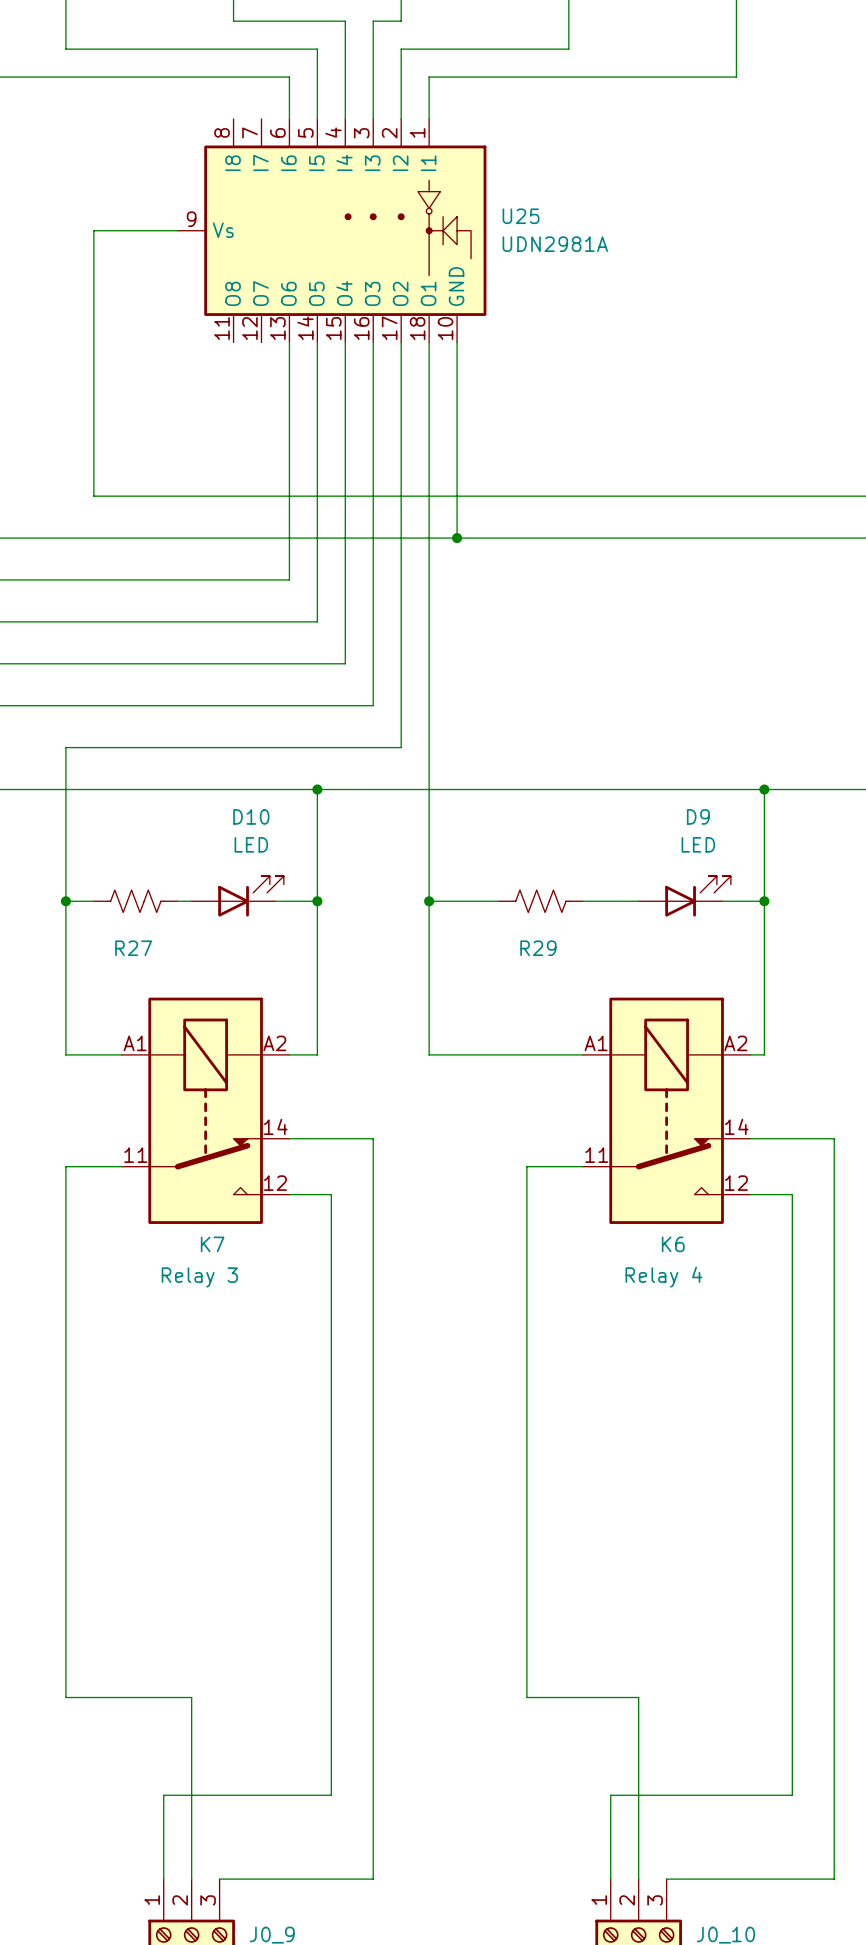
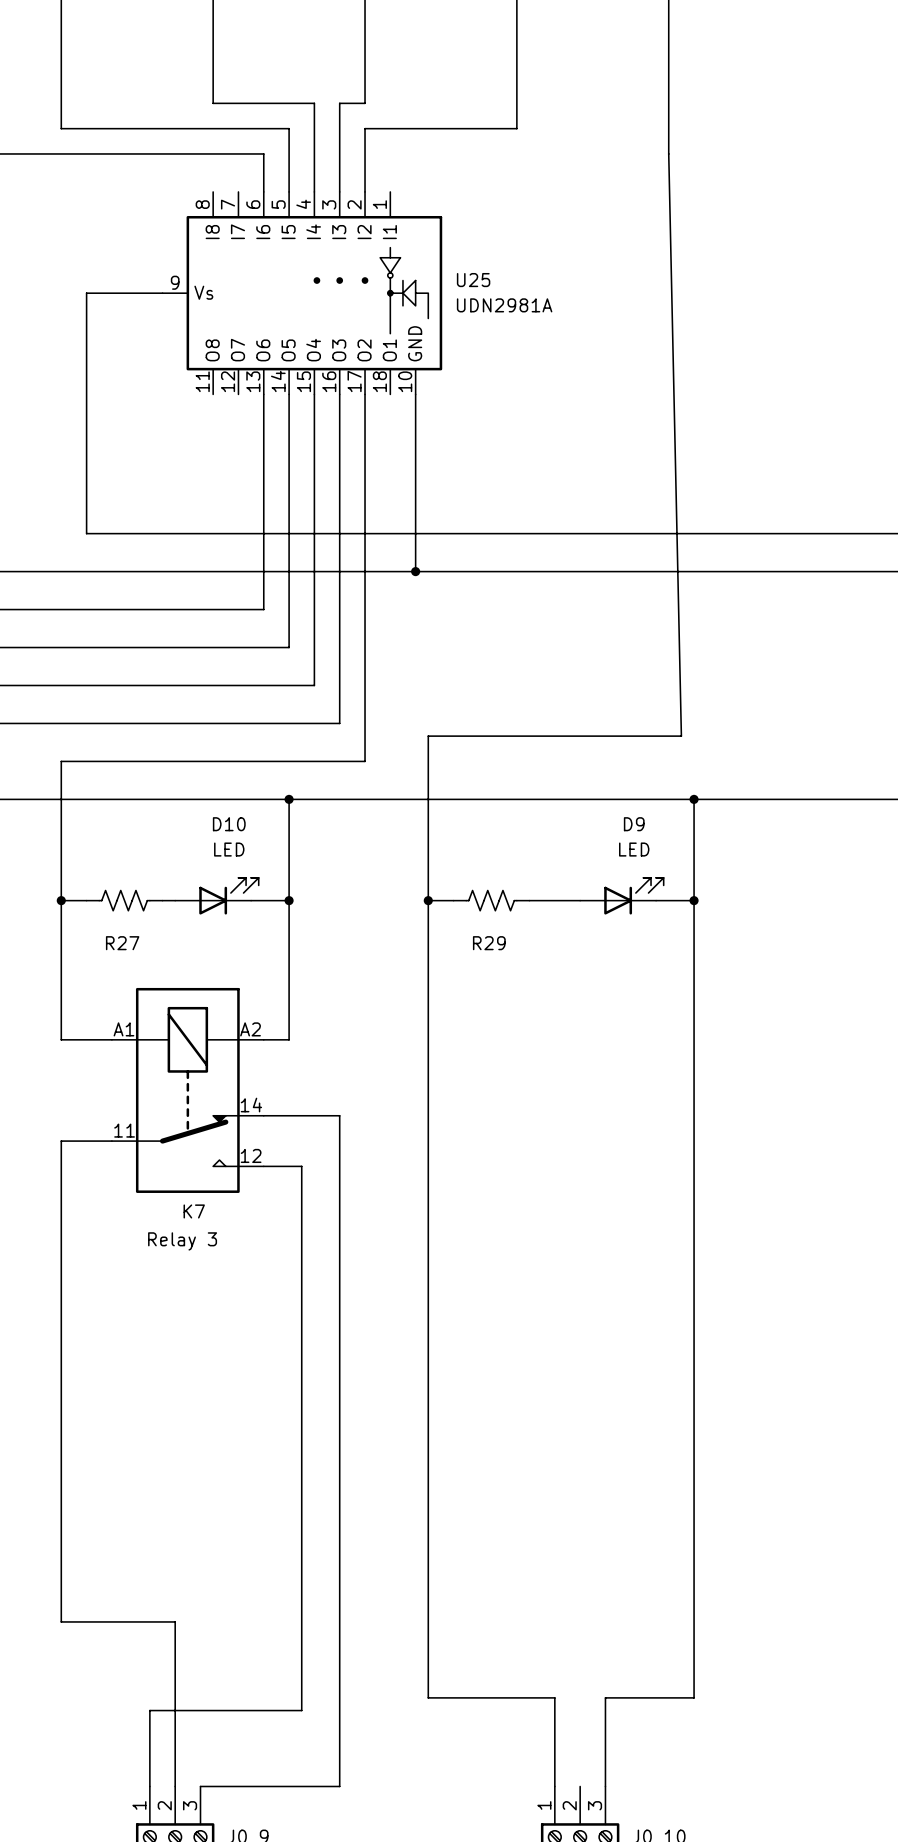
wire: (736, 77) (429, 77) (429, 118) -> none
wire: (429, 342) (429, 1054) (582, 1054) -> none
wire: (429, 901) (471, 901) -> none
junction position: (429, 901) -> (428, 900)
wire: (750, 1054) (764, 1054) -> none
K6: Relay 4 (666, 1110) -> none
wire: (750, 1138) (834, 1138) (834, 1879) (666, 1879) -> (694, 1039) (694, 1697) (605, 1697) (605, 1786)
wire: (582, 1166) (526, 1166) (526, 1697) (638, 1697) (638, 1879) -> none
wire: (750, 1194) (792, 1194) (792, 1795) (610, 1795) -> (668, 153) (681, 736) (428, 736) (428, 1697) (554, 1697) (554, 1710)

